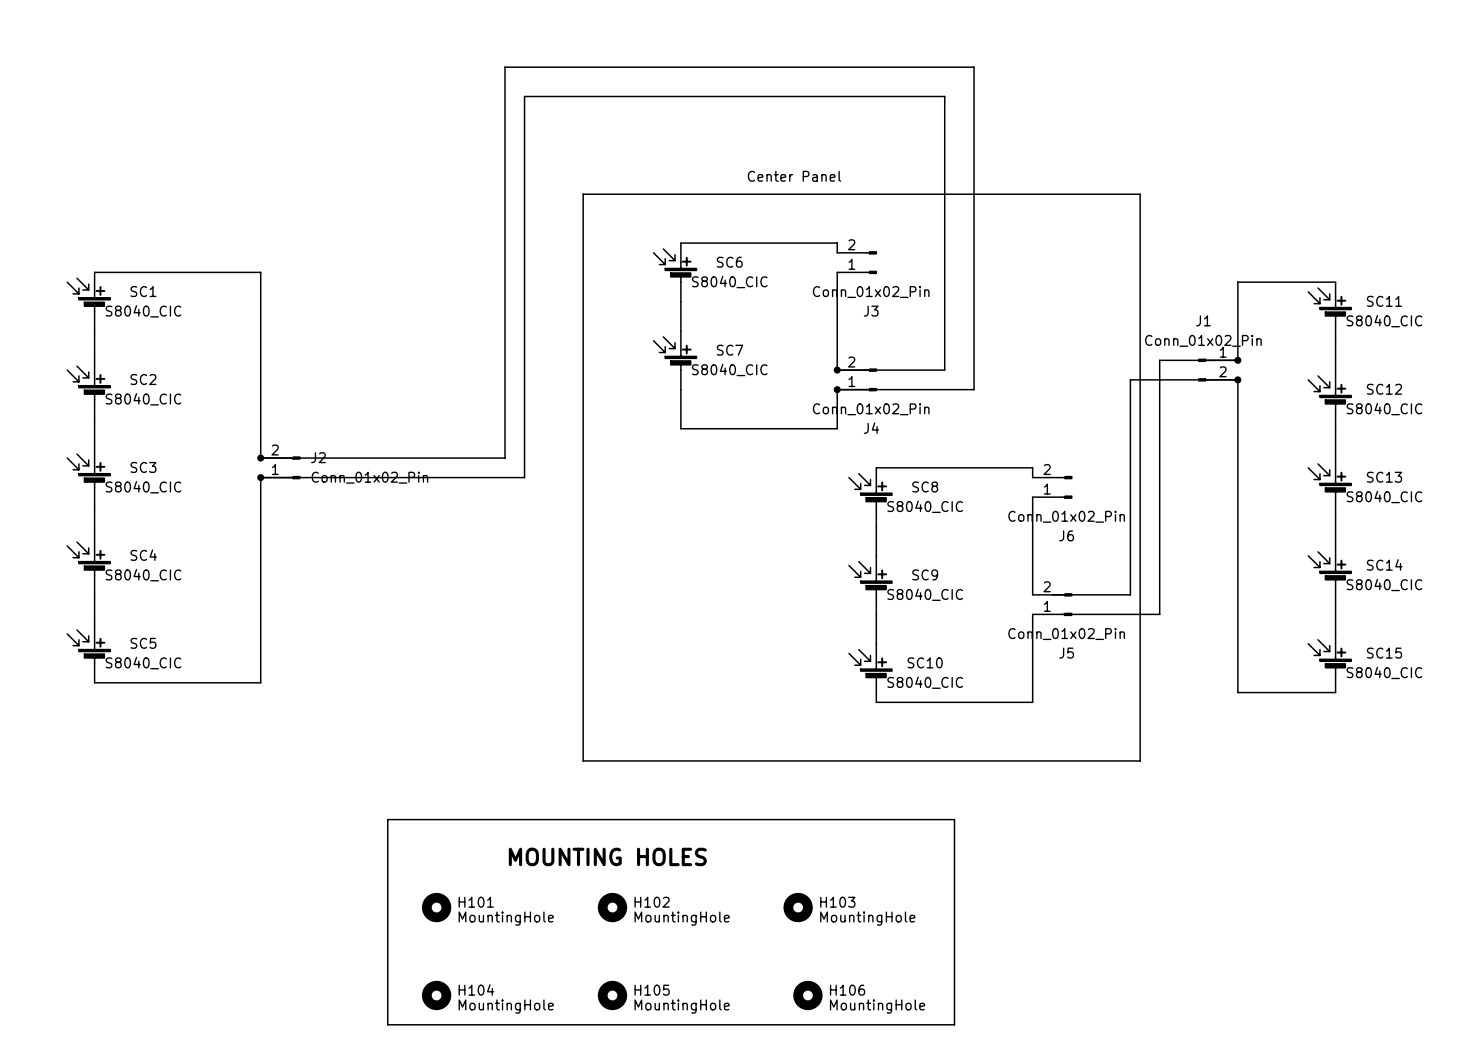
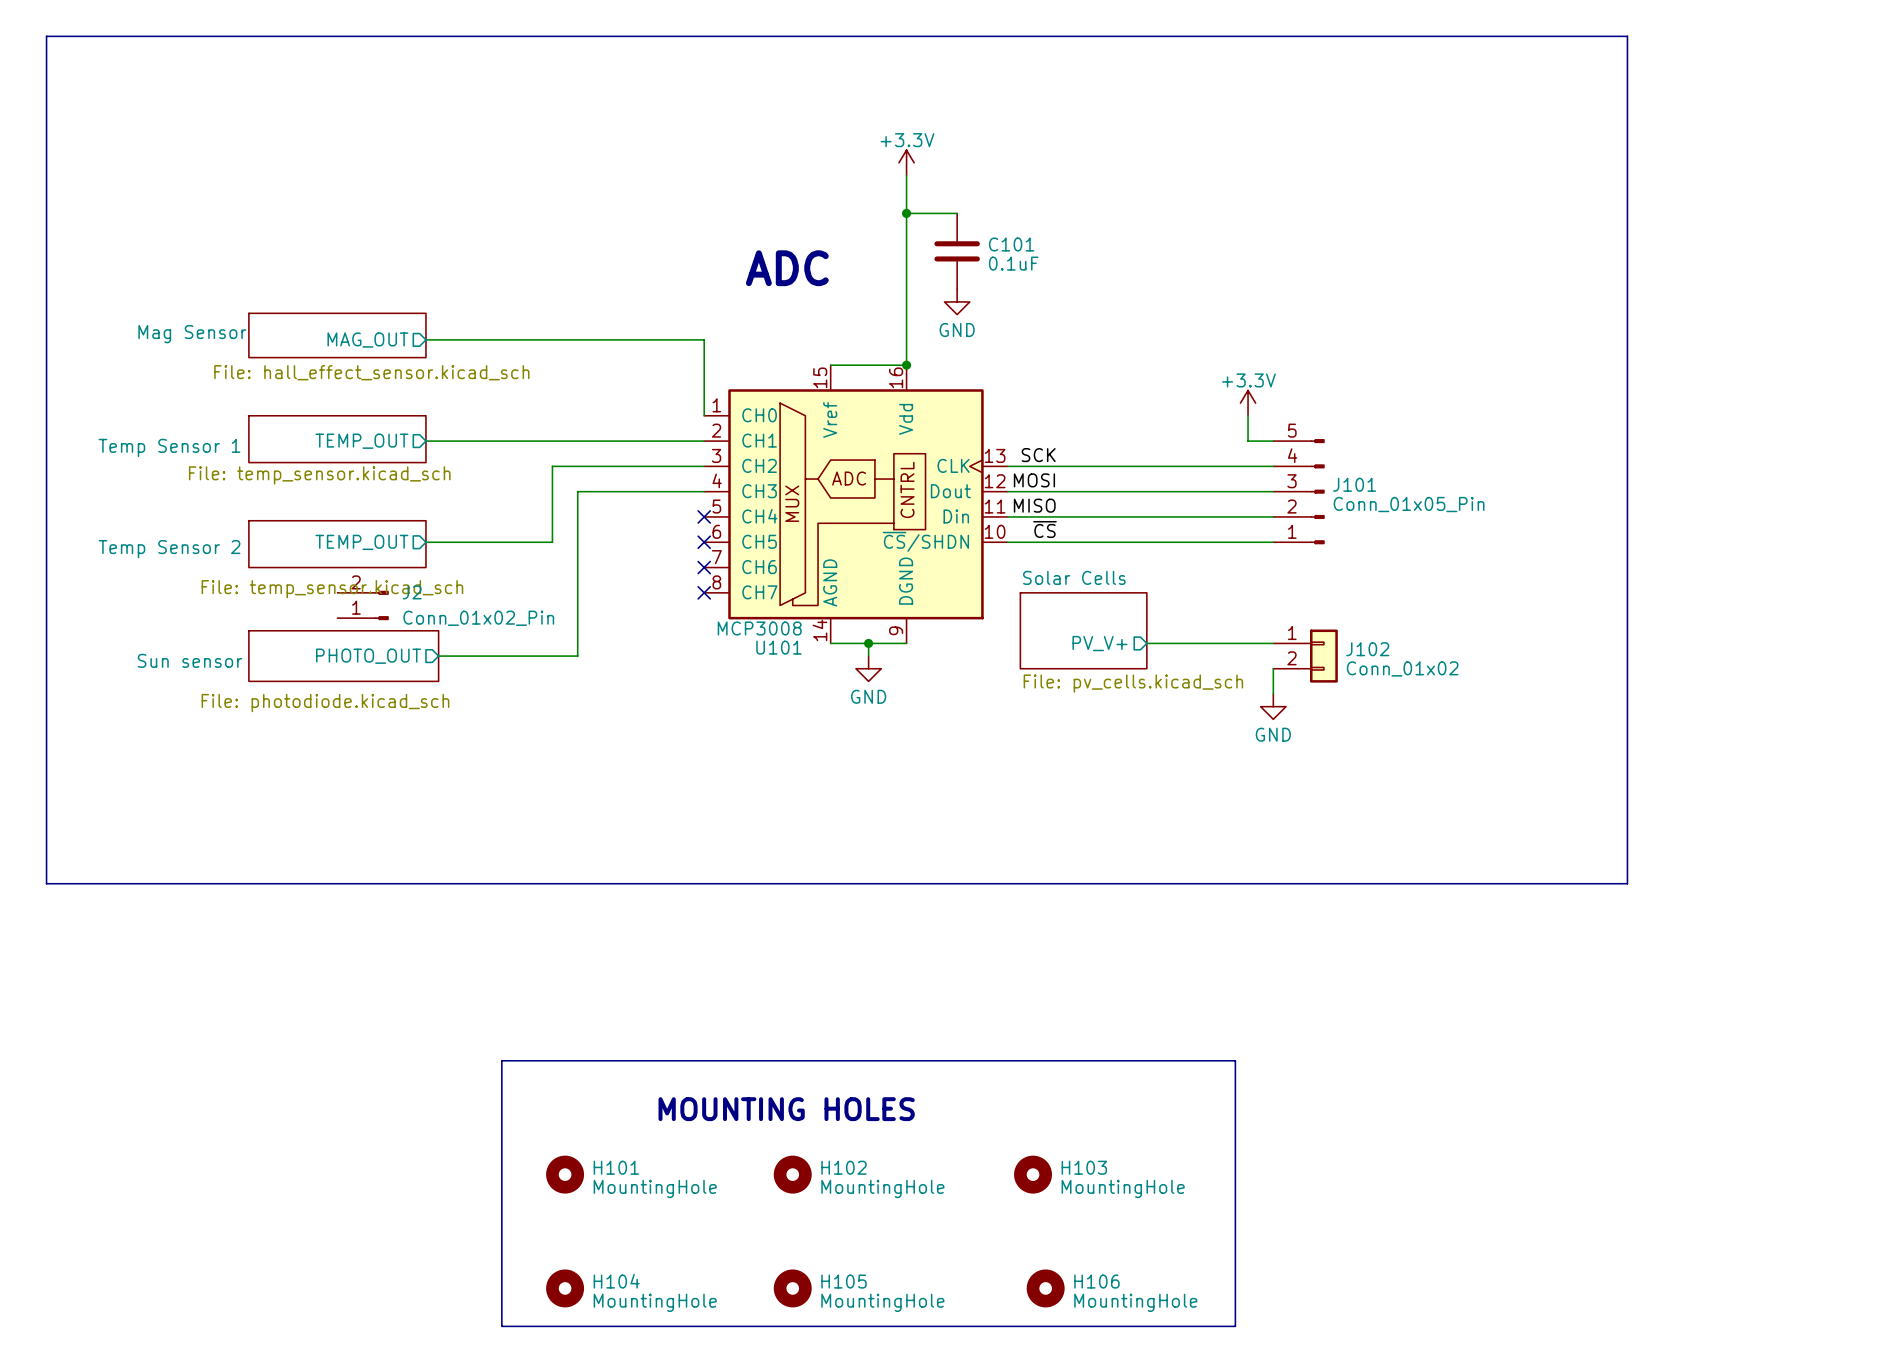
line: none -> (46, 36) (1627, 36) (1627, 883) (46, 883) (46, 36)
power symbol: none -> +3.3V (906, 162)
wire: none -> (906, 175) (906, 365) (830, 365)
wire: none -> (906, 213) (957, 213)
junction: none -> (906, 213)
text: Center Panel (794, 176) -> none
line: (583, 194) (1140, 194) (1140, 760) (583, 760) (583, 194) -> none
C101: none -> 0.1uF (957, 251)
text: none -> ADC (787, 268)
power symbol: none -> GND (957, 301)
wire: (680, 243) (837, 243) (837, 252) -> none
sheet Mag Sensor: none -> File: hall_effect_sensor.kicad_sch (337, 335)
sheet pin: none -> MAG_OUT (367, 340)
wire: none -> (425, 339) (704, 339) (704, 415)
J3: Conn_01x02_Pin (857, 262) -> none
wire: (94, 272) (260, 272) (260, 458) (505, 458) (505, 67) (974, 67) (974, 389) (837, 389) (837, 428) (680, 428) (680, 389) -> none
SC6: S8040_CIC (675, 272) -> none
wire: (837, 272) (837, 370) (944, 370) (944, 96) (524, 96) (524, 477) (260, 477) (260, 682) (94, 682) -> none
junction: none -> (906, 365)
wire: (1335, 282) (1237, 282) (1237, 360) (1159, 360) (1159, 614) (1061, 614) -> none
SC1: S8040_CIC (88, 301) -> none
power symbol: none -> +3.3V (1248, 403)
SC11: S8040_CIC (1329, 311) -> none
wire: none -> (1248, 415) (1248, 441) (1273, 441)
wire: (94, 331) (94, 360) -> none
sheet Temp Sensor 1: none -> File: temp_sensor.kicad_sch (337, 439)
sheet pin: none -> TEMP_OUT (361, 441)
wire: none -> (425, 441) (704, 441)
wire: (1335, 340) (1335, 370) -> none
label: none -> SCK (1038, 455)
wire: none -> (704, 466) (552, 466) (552, 542) (425, 542)
SC7: S8040_CIC (675, 360) -> none
wire: none -> (1007, 466) (1273, 466)
junction: (1237, 360) -> none
junction: (837, 370) -> none
J1: Conn_01x02_Pin (1218, 370) -> none
label: none -> MOSI (1034, 480)
wire: none -> (704, 491) (577, 491) (577, 656) (438, 656)
wire: none -> (1007, 491) (1273, 491)
J4: Conn_01x02_Pin (857, 379) -> none
J101: none -> Conn_01x05_Pin (1299, 491)
junction: (1237, 379) -> none
SC2: S8040_CIC (88, 389) -> none
U101: none -> MCP3008 (855, 504)
junction: (837, 389) -> none
label: none -> MISO (1034, 505)
no-connect mark: none -> (704, 516)
wire: none -> (1007, 516) (1273, 516)
SC12: S8040_CIC (1329, 399) -> none
label: none -> ~{CS} (1044, 529)
wire: (94, 418) (94, 448) -> none
no-connect mark: none -> (704, 542)
wire: none -> (1007, 542) (1273, 542)
sheet pin: none -> TEMP_OUT (361, 542)
sheet Temp Sensor 2: none -> File: temp_sensor.kicad_sch (337, 544)
wire: (1335, 428) (1335, 458) -> none
no-connect mark: none -> (704, 567)
junction: (260, 458) -> none
no-connect mark: none -> (704, 592)
wire: (876, 467) (1032, 467) (1032, 477) -> none
SC3: S8040_CIC (88, 477) -> none
junction: (260, 477) -> none
sheet Solar Cells: none -> File: pv_cells.kicad_sch (1083, 630)
J6: Conn_01x02_Pin (1052, 487) -> none
SC13: S8040_CIC (1329, 487) -> none
wire: none -> (830, 643) (906, 643)
wire: none -> (868, 643) (868, 656)
junction: none -> (868, 643)
sheet pin: none -> PV_V+ (1099, 643)
SC8: S8040_CIC (870, 497) -> none
wire: none -> (1146, 643) (1273, 643)
wire: (1032, 497) (1032, 594) -> none
wire: (94, 506) (94, 536) -> none
sheet Sun sensor: none -> File: photodiode.kicad_sch (343, 656)
J102: none -> Conn_01x02 (1305, 656)
sheet pin: none -> PHOTO_OUT (368, 656)
power symbol: none -> GND (868, 668)
wire: none -> (1273, 668) (1273, 694)
wire: (1335, 516) (1335, 545) -> none
wire: (876, 526) (876, 555) -> none
power symbol: none -> GND (1273, 706)
SC4: S8040_CIC (88, 565) -> none
SC14: S8040_CIC (1329, 575) -> none
SC9: S8040_CIC (870, 585) -> none
wire: (94, 594) (94, 624) -> none
wire: (1052, 594) (1130, 594) (1130, 379) (1237, 379) (1237, 692) (1335, 692) -> none
J5: Conn_01x02_Pin (1052, 604) -> none
wire: (1335, 604) (1335, 633) -> none
wire: (876, 614) (876, 643) -> none
wire: (1032, 614) (1032, 702) (876, 702) -> none
SC5: S8040_CIC (88, 653) -> none
SC15: S8040_CIC (1329, 663) -> none
SC10: S8040_CIC (870, 673) -> none

